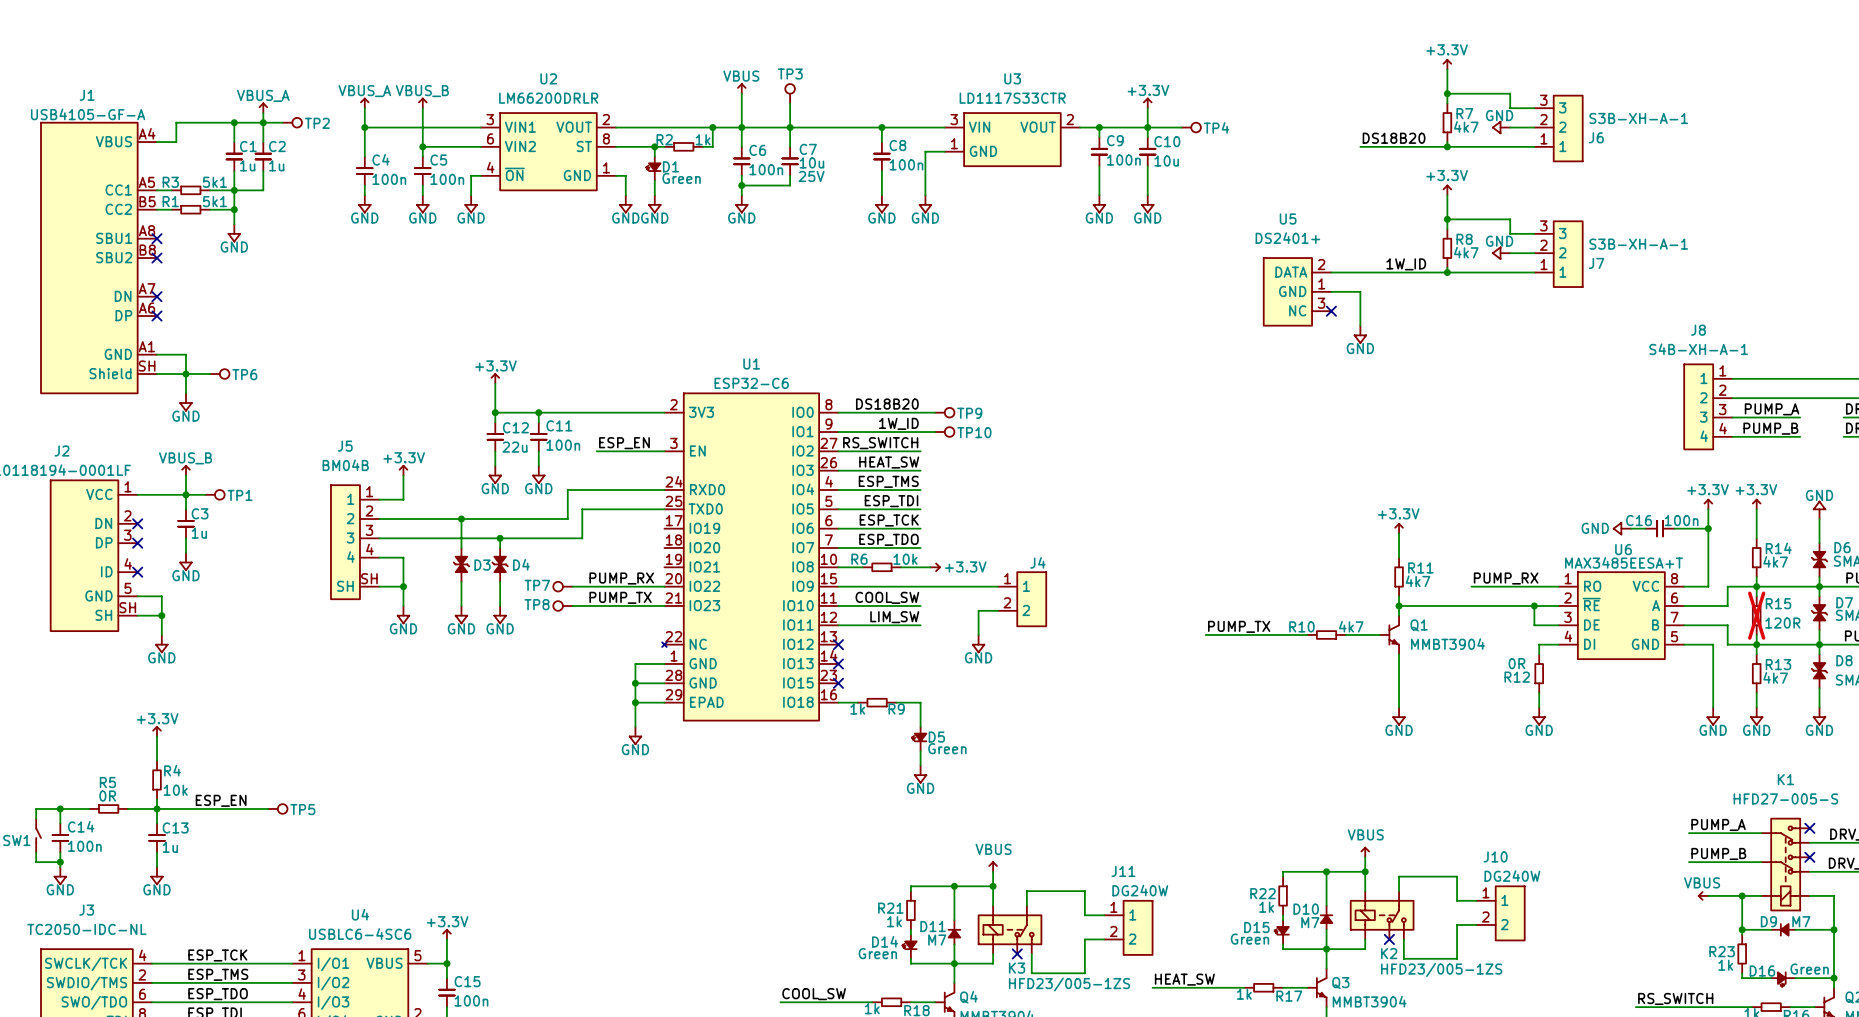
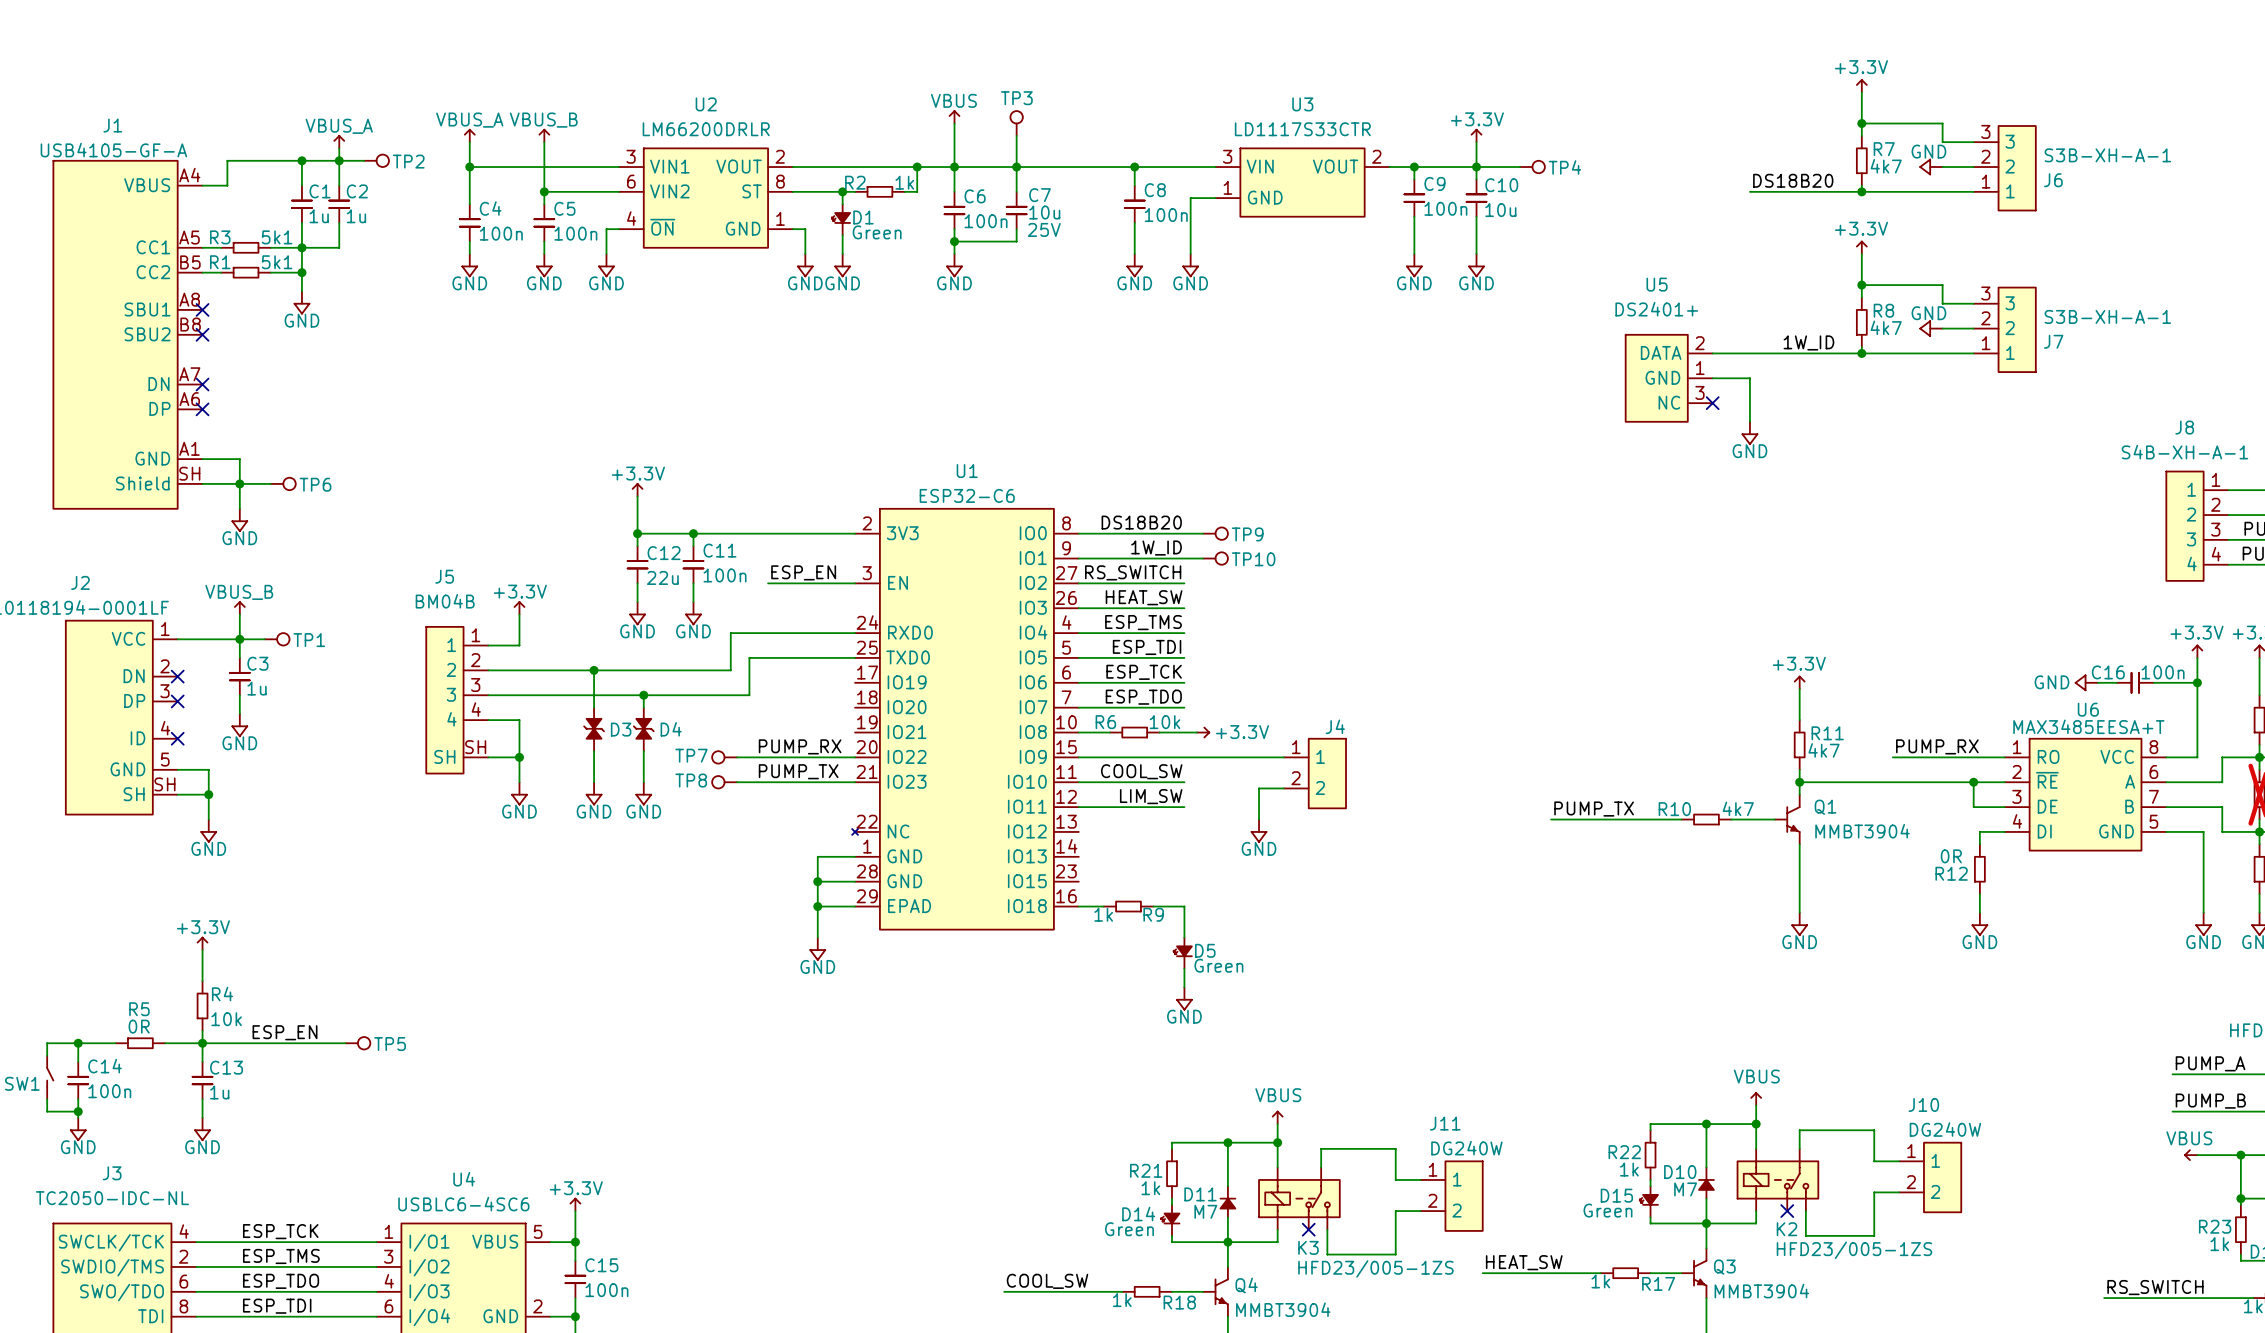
no-connect mark: (838, 644) -> none
no-connect mark: (838, 663) -> none
no-connect mark: (838, 683) -> none

